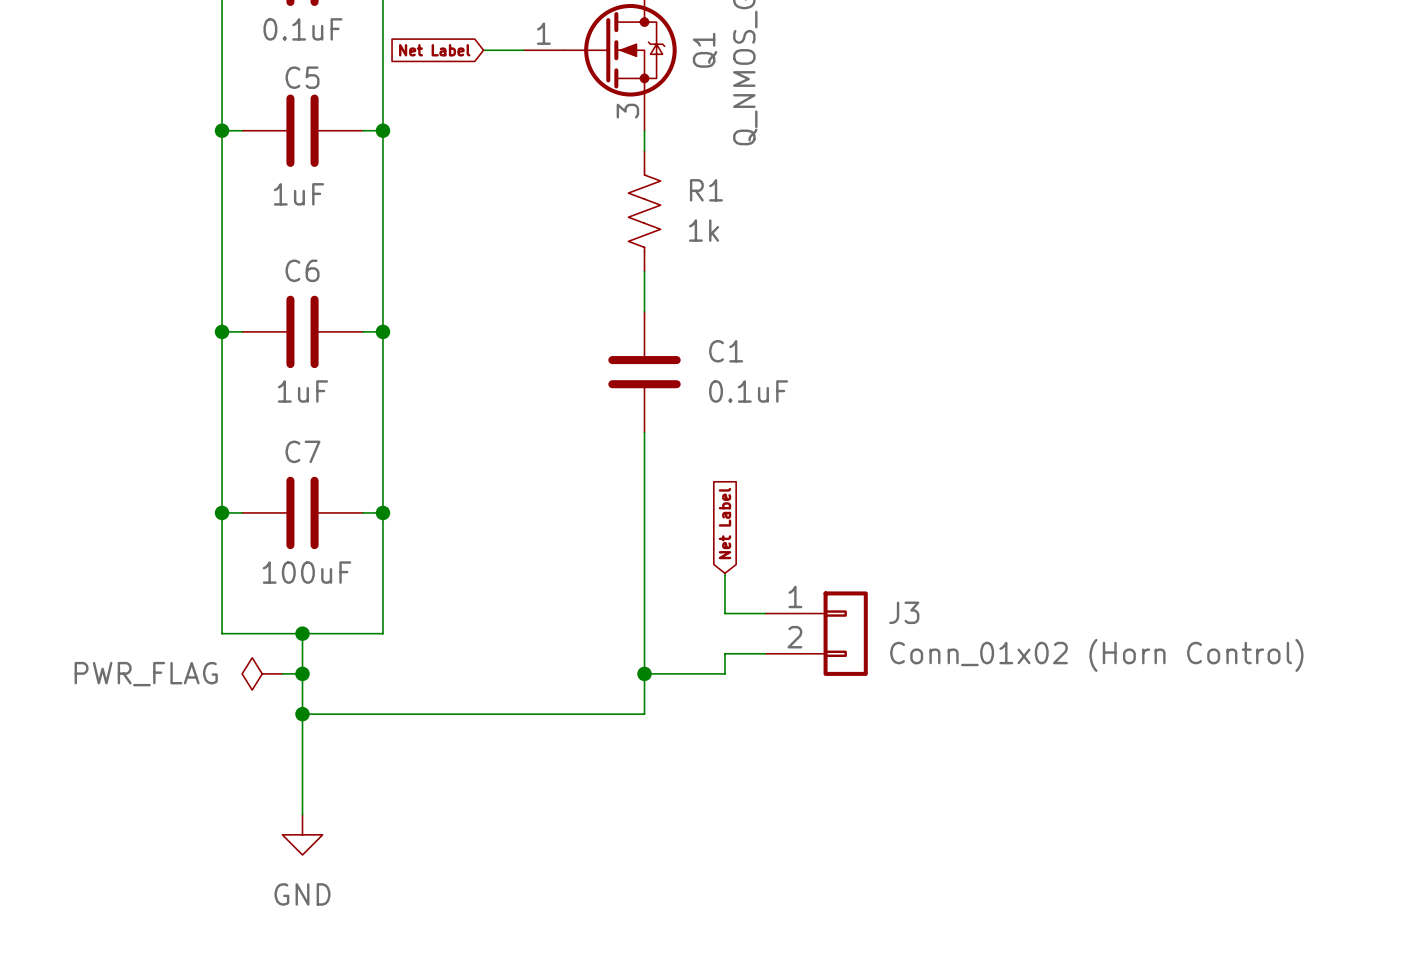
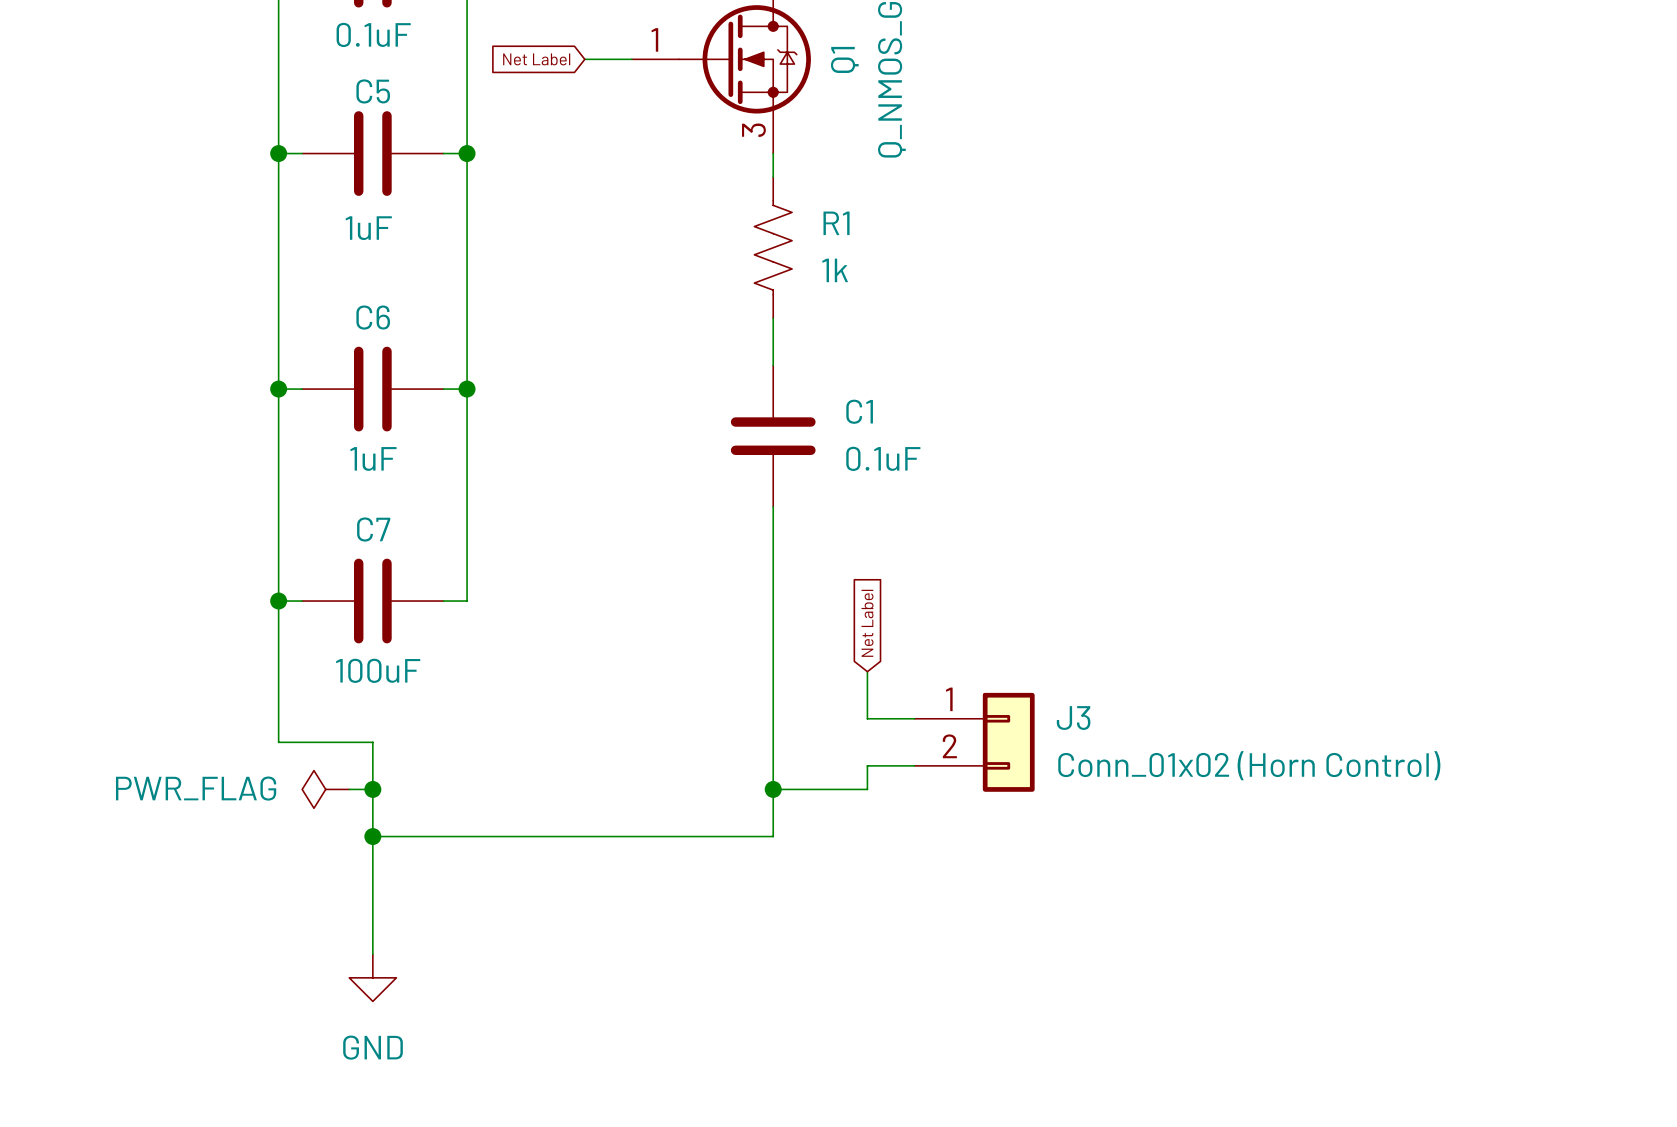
wire: (382, 512) (382, 633) (302, 633) -> none
junction: (382, 512) -> none
junction: (302, 633) -> none

